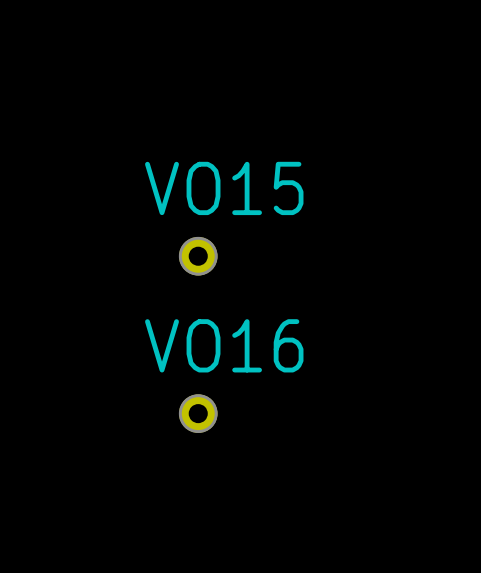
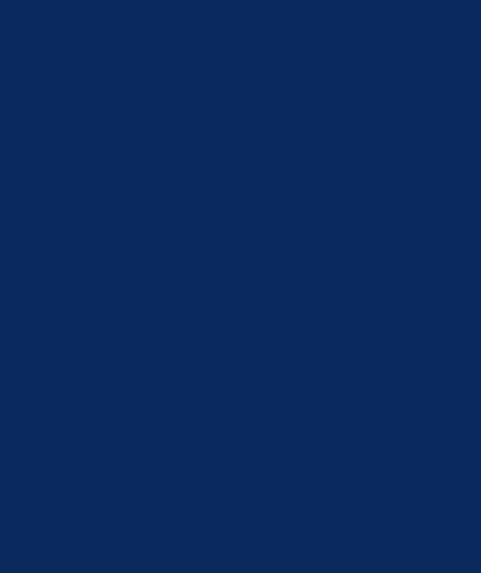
VO15: (198, 256) -> none
VO16: (198, 413) -> none

